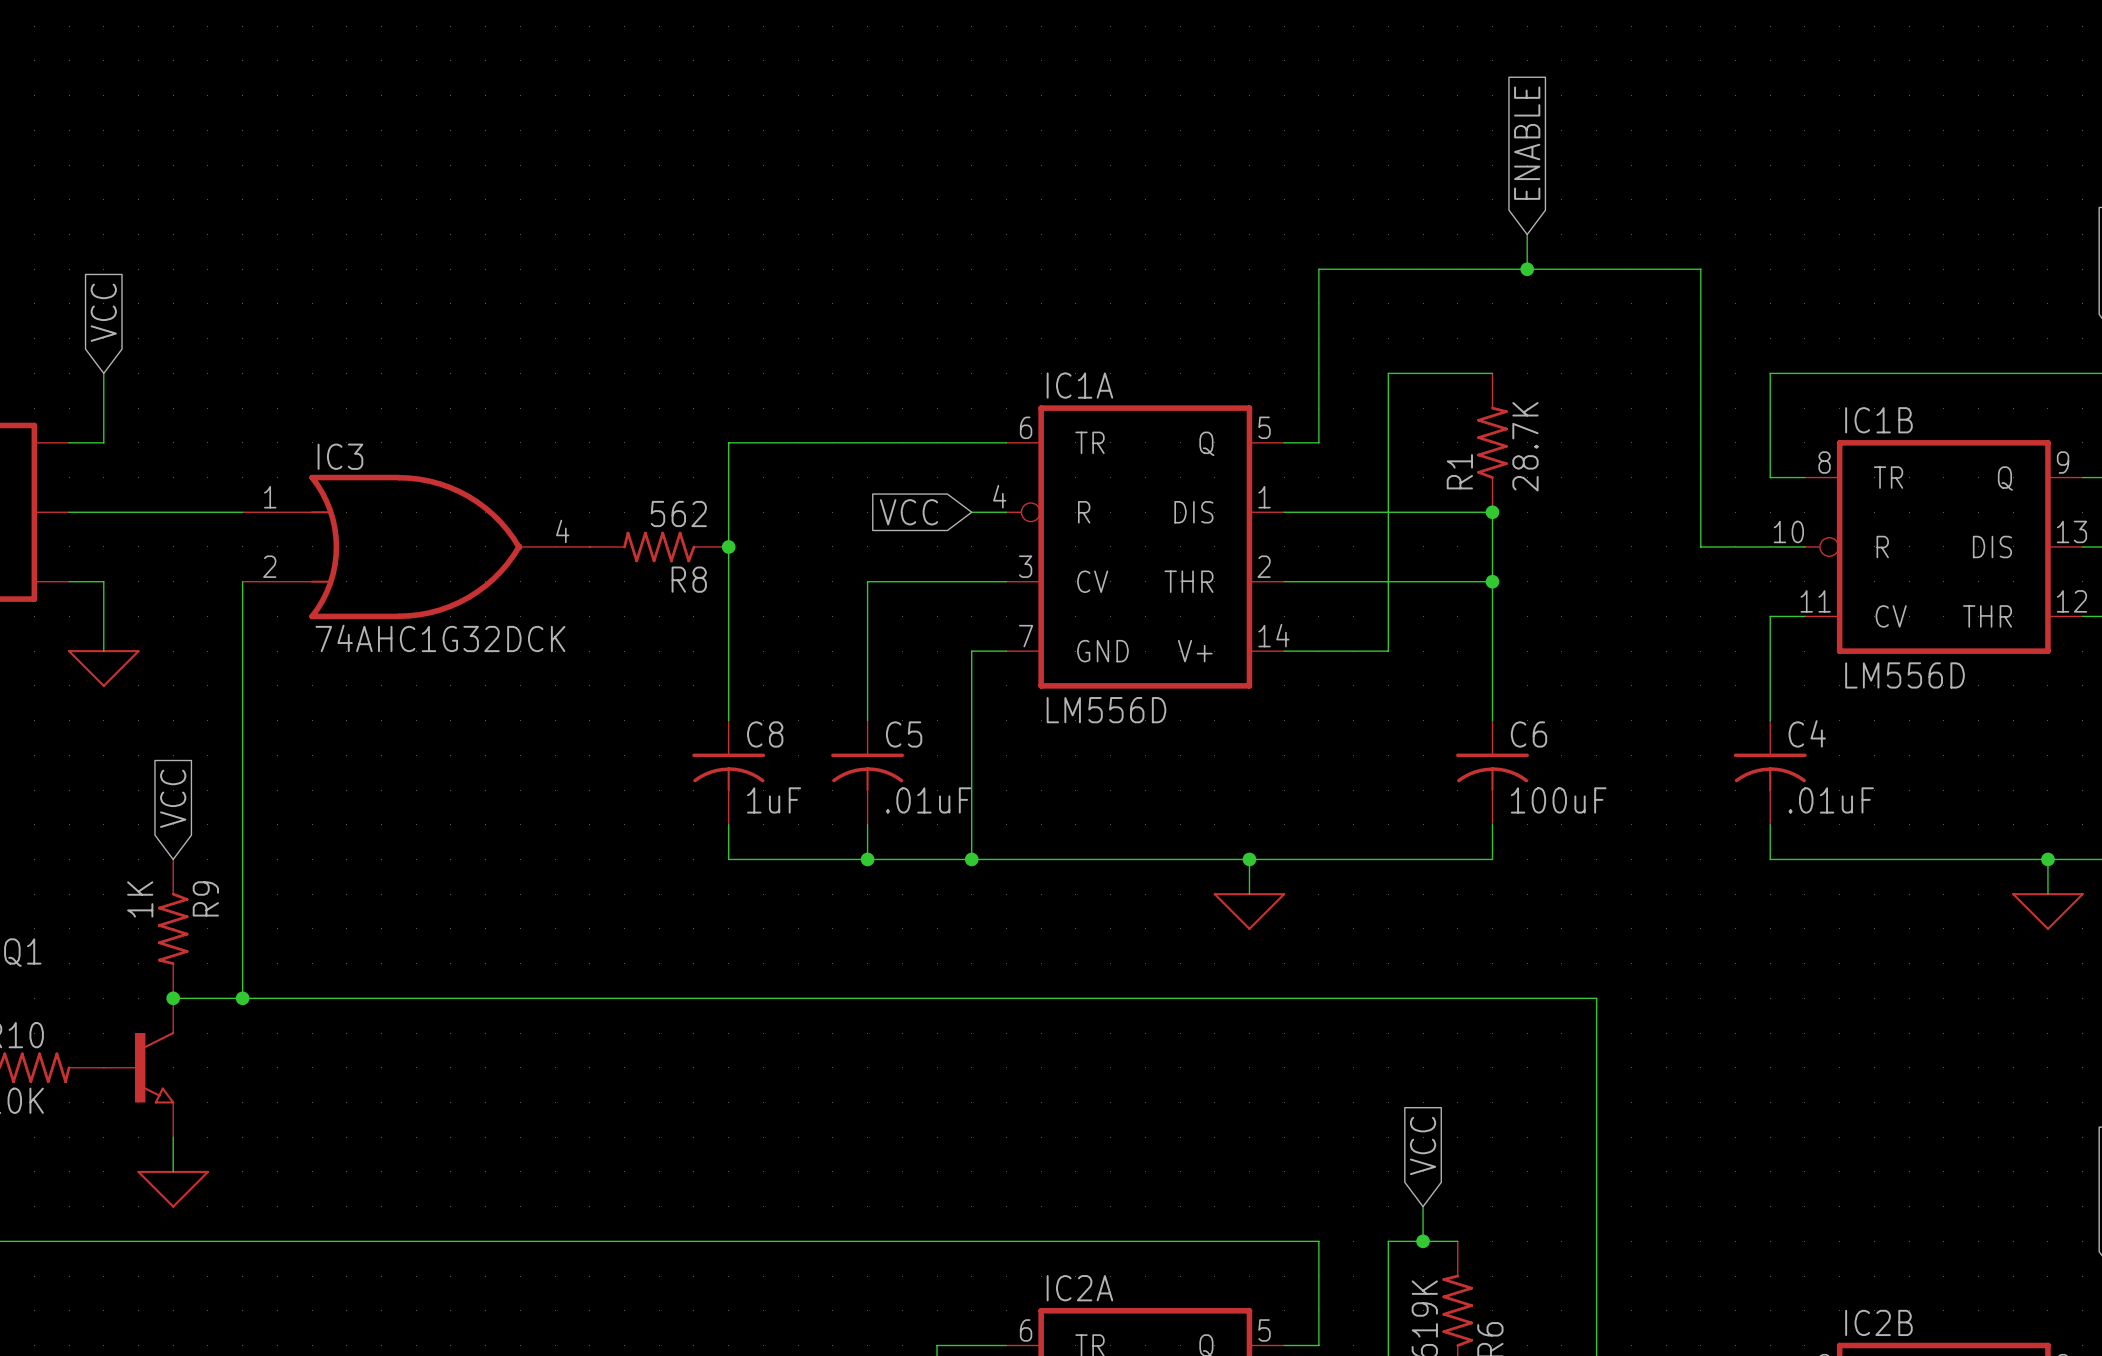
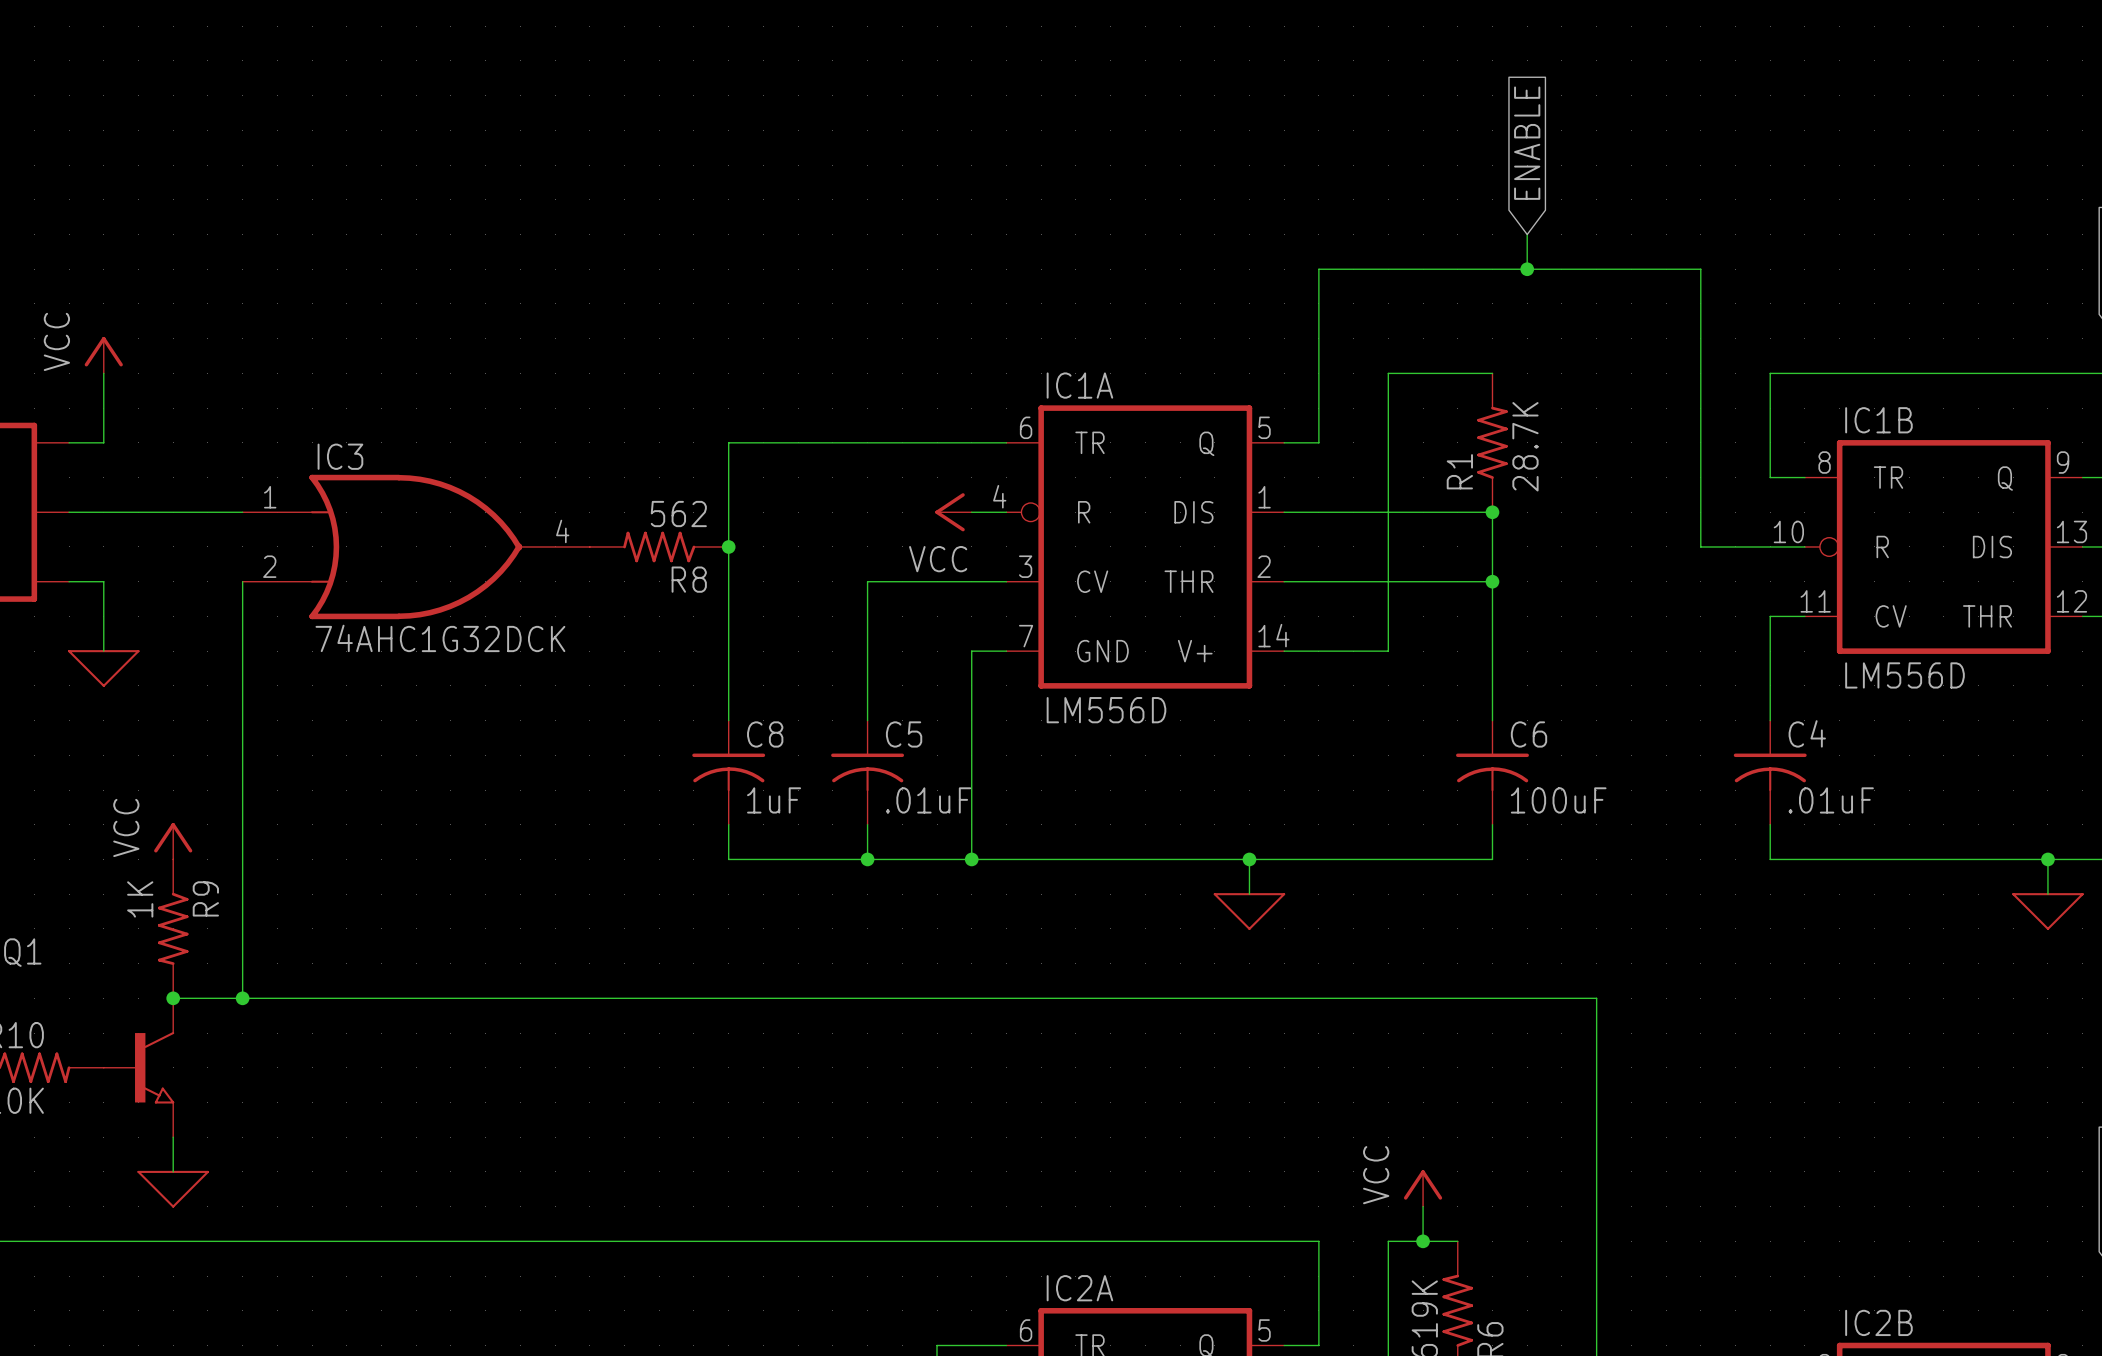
global label: VCC (103, 312) -> none
power symbol: none -> VCC (103, 355)
global label: VCC (908, 512) -> none
power symbol: none -> VCC (953, 512)
global label: VCC (173, 798) -> none
power symbol: none -> VCC (173, 841)
global label: VCC (1423, 1145) -> none
power symbol: none -> VCC (1423, 1188)

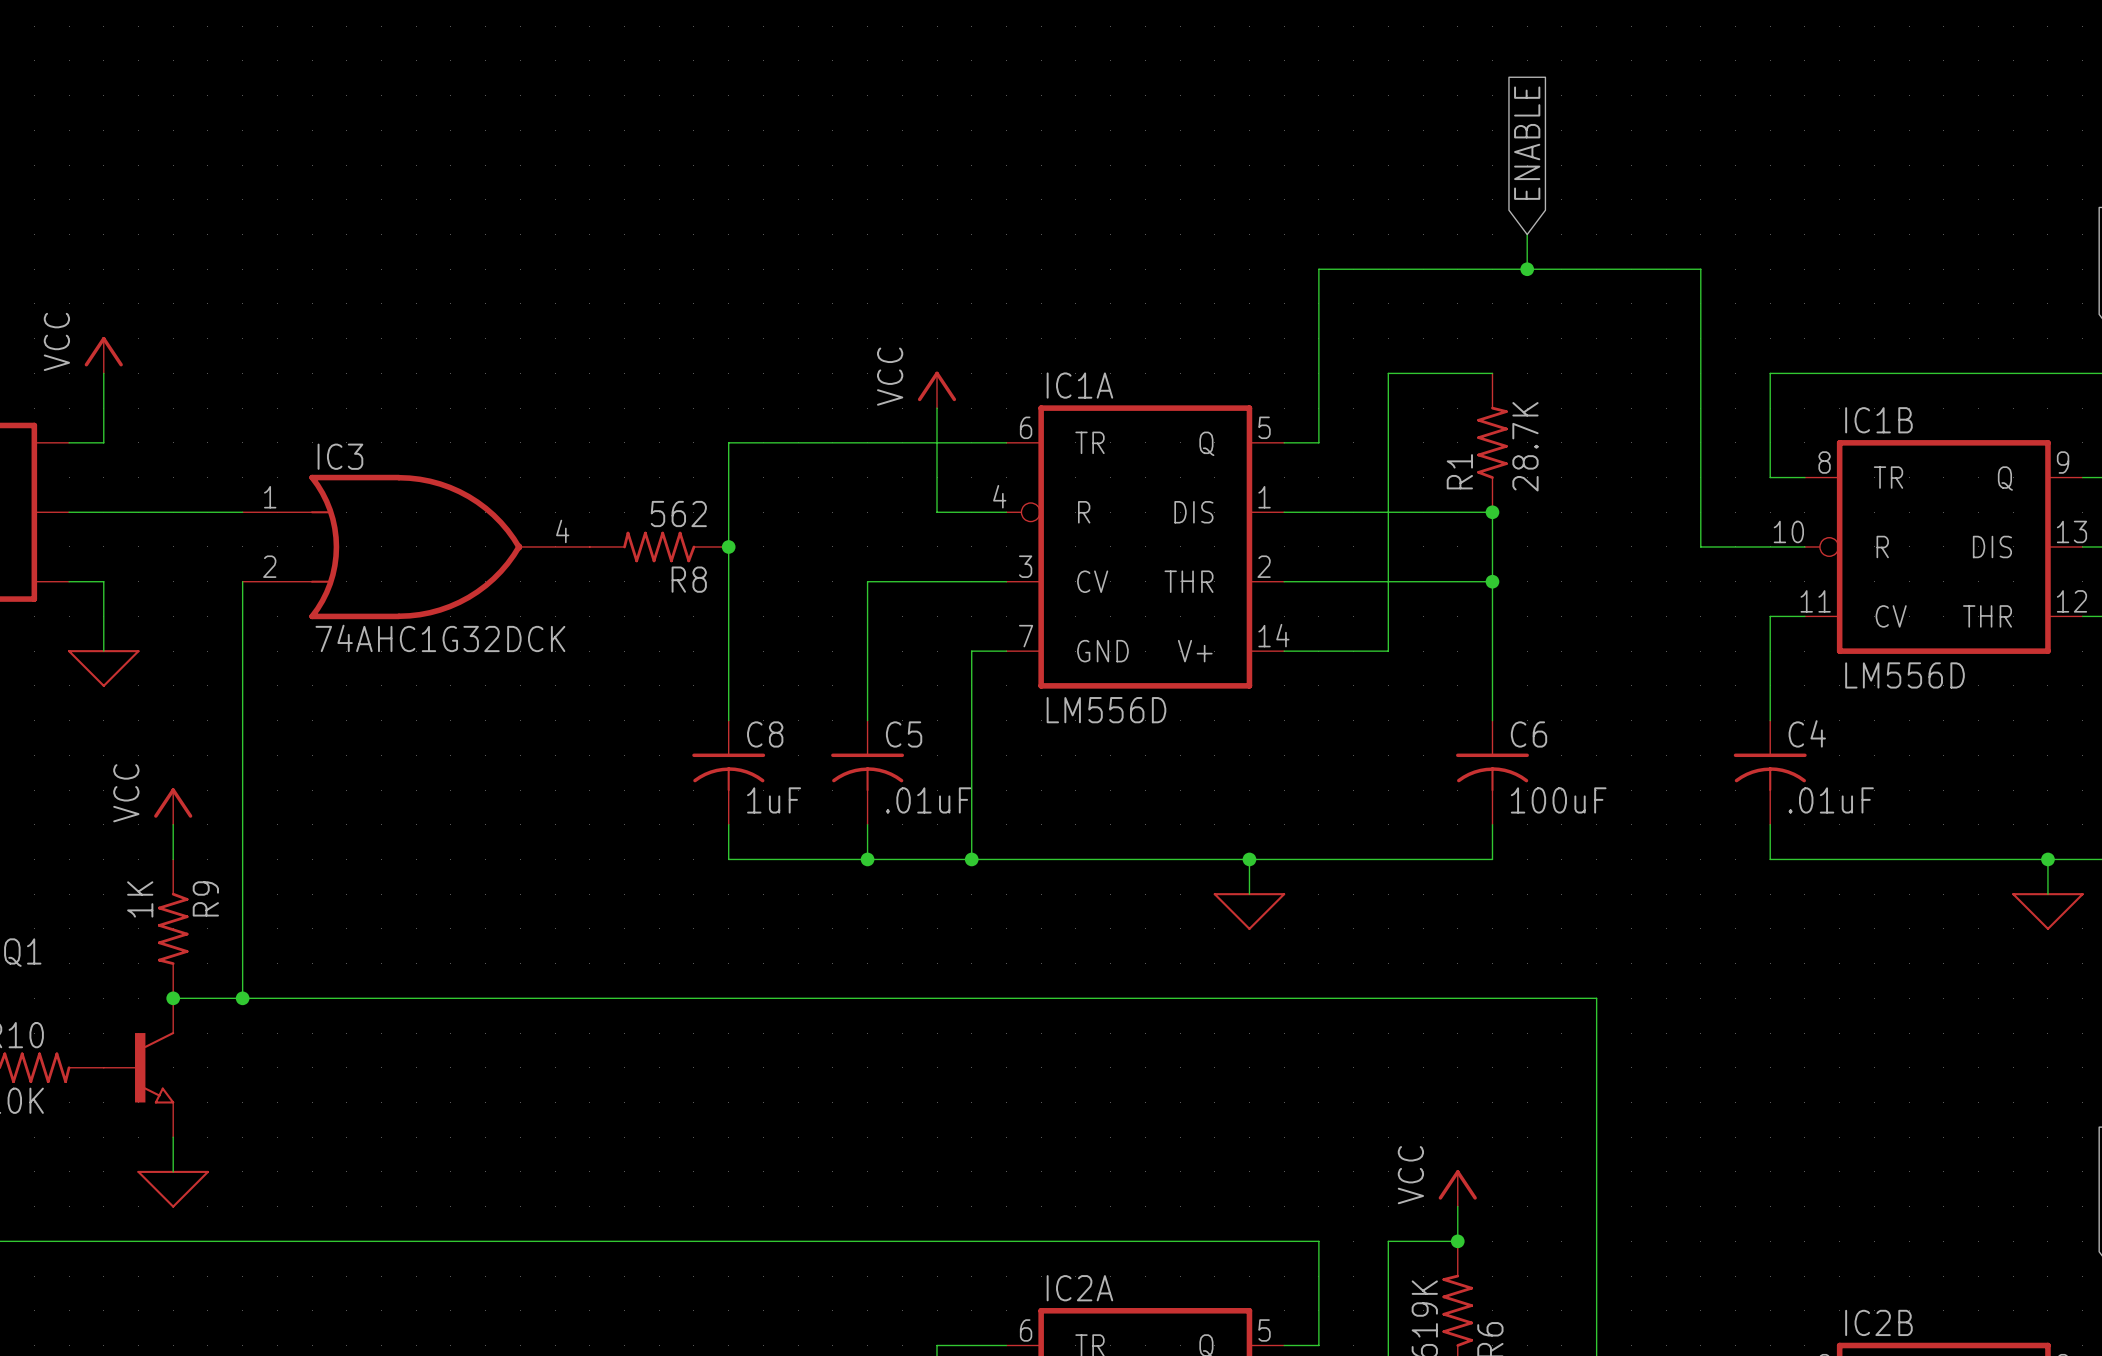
wire: none -> (937, 408) (937, 512) (971, 512)
power symbol rotation: 0° (950, 512) -> 90° clockwise (937, 386)
power symbol position: VCC (953, 512) -> VCC (937, 389)
power symbol position: VCC (173, 841) -> VCC (173, 806)
power symbol position: VCC (1423, 1188) -> VCC (1457, 1188)
wire: (1423, 1206) (1423, 1241) -> (1457, 1206) (1457, 1241)
junction position: (1423, 1241) -> (1457, 1241)

